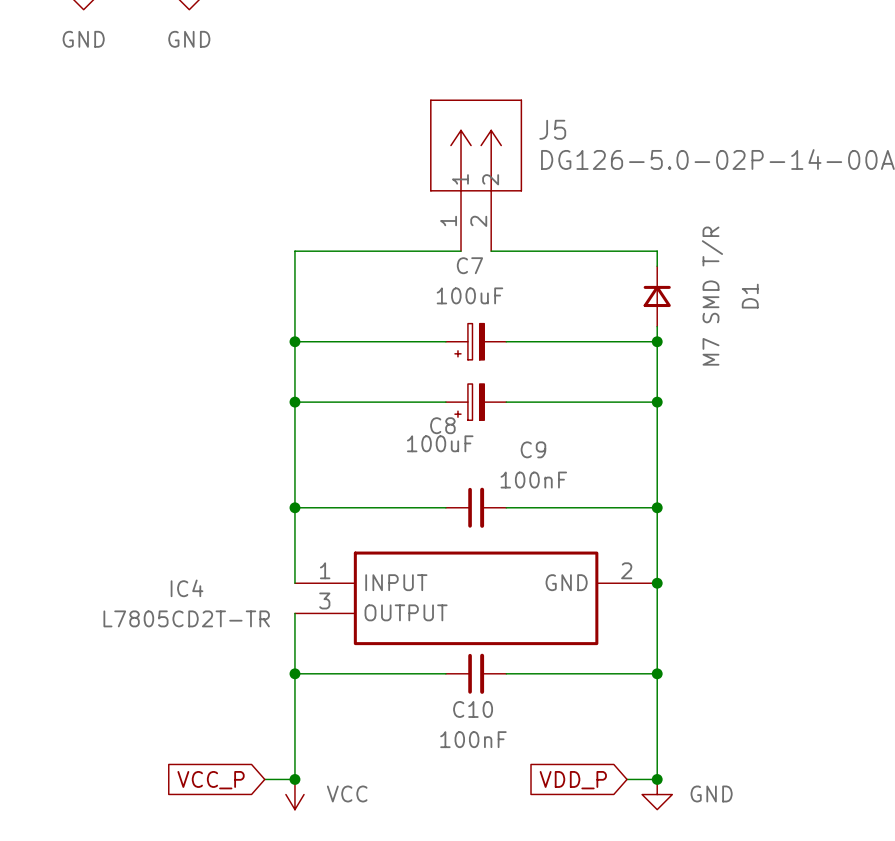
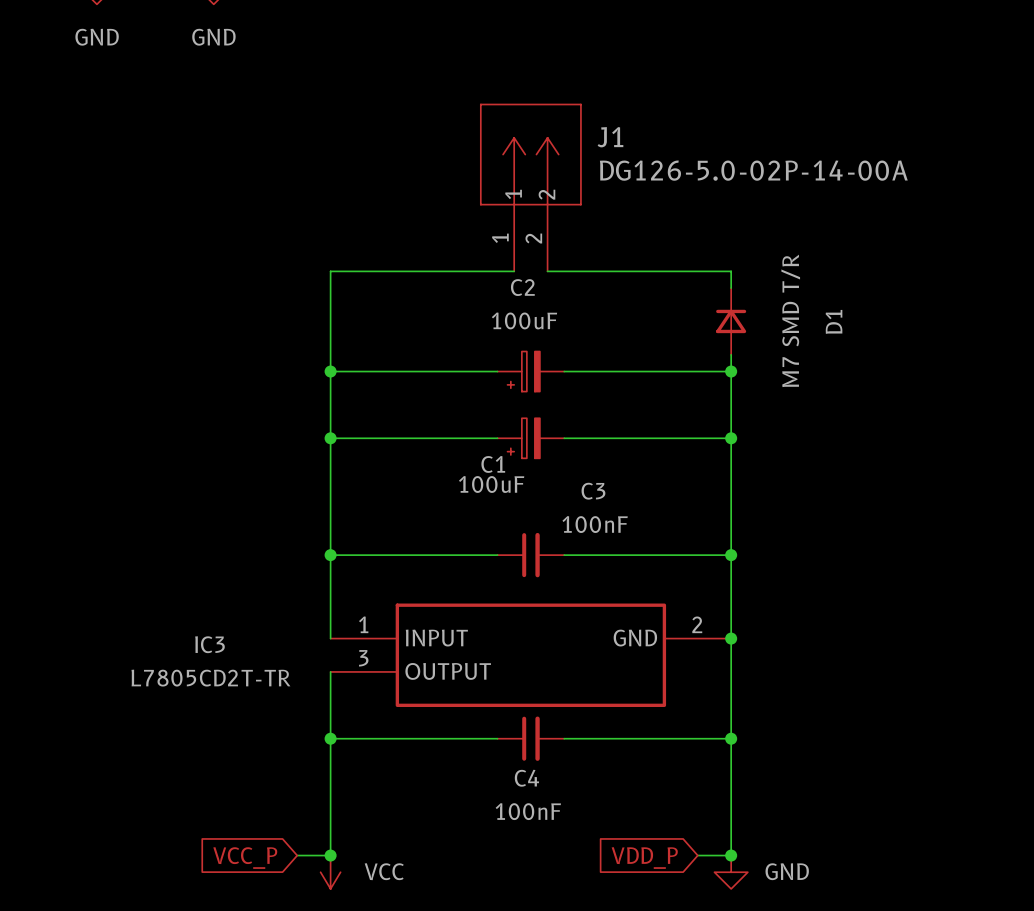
J5 name: J5 (552, 129) -> J1 (610, 137)
C7 name: C7 (469, 265) -> C2 (522, 287)
C8 name: C8 (442, 425) -> C1 (493, 464)
C9 name: C9 (533, 449) -> C3 (593, 491)
IC4 name: IC4 (187, 588) -> IC3 (209, 644)
C10 name: C10 (473, 709) -> C4 (526, 778)

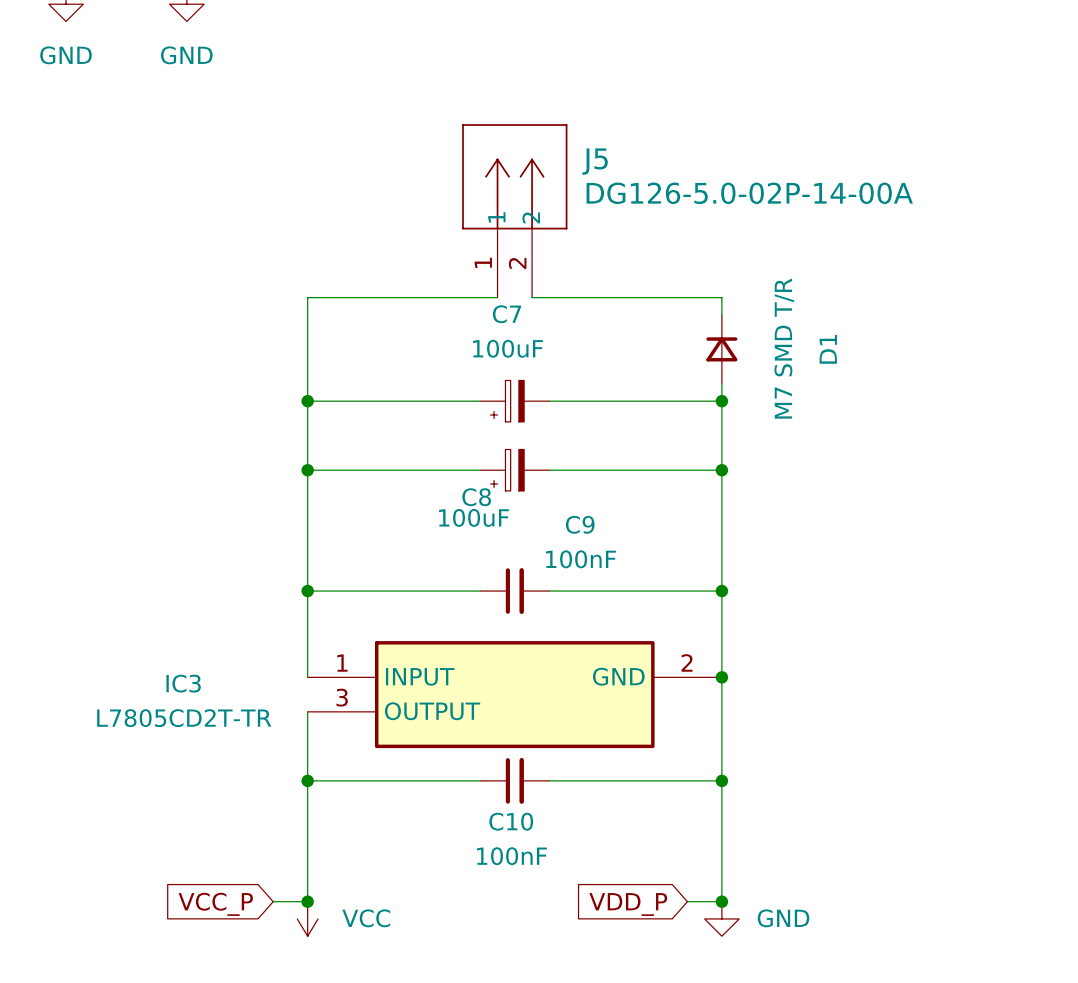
J1 name: J1 (610, 137) -> J5 (595, 161)
C2 name: C2 (522, 287) -> C7 (507, 314)
C1 name: C1 (493, 464) -> C8 (476, 497)
C3 name: C3 (593, 491) -> C9 (580, 524)
C4 name: C4 (526, 778) -> C10 (511, 821)

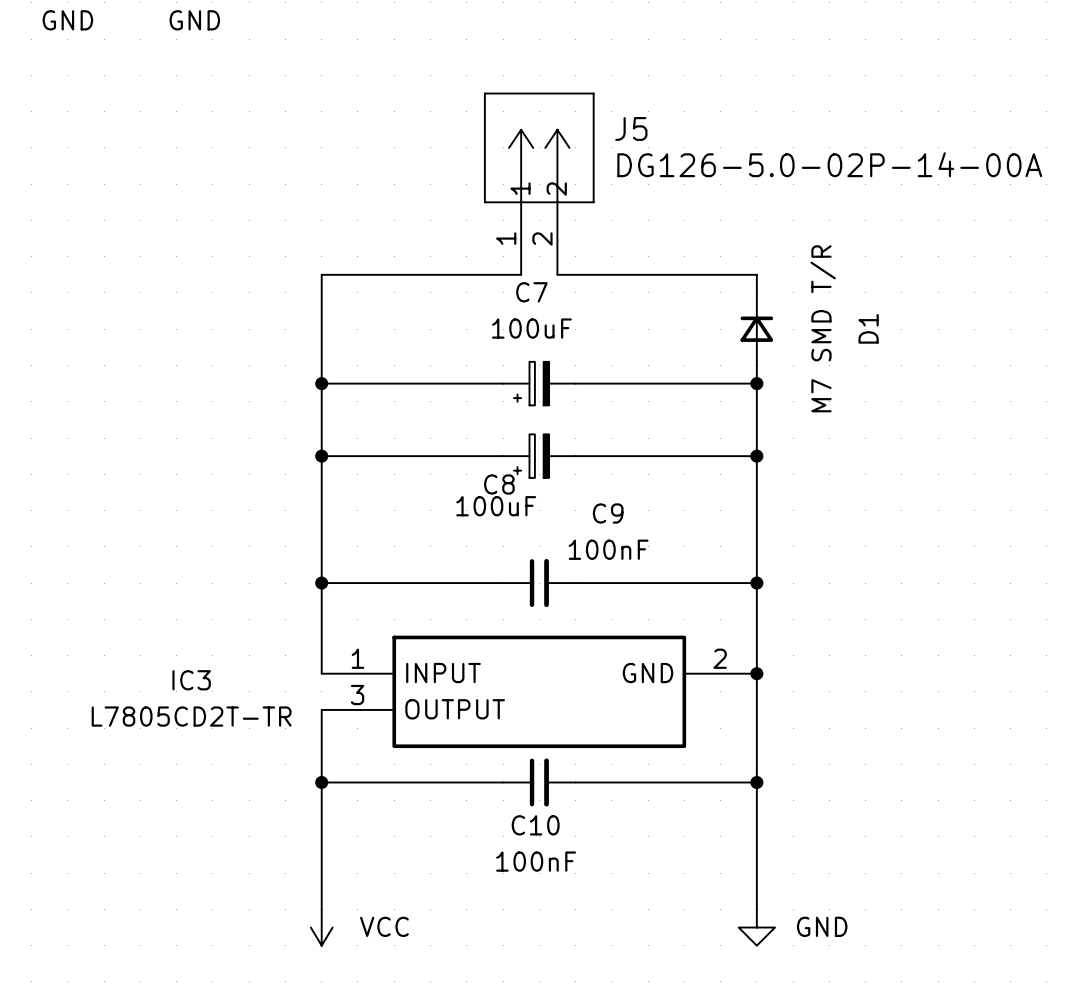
wire: (273, 901) (307, 901) -> none
junction: (307, 901) -> none
wire: (687, 901) (721, 901) -> none
junction: (721, 901) -> none
global label: VCC_P (215, 904) -> none
global label: VDD_P (628, 904) -> none

